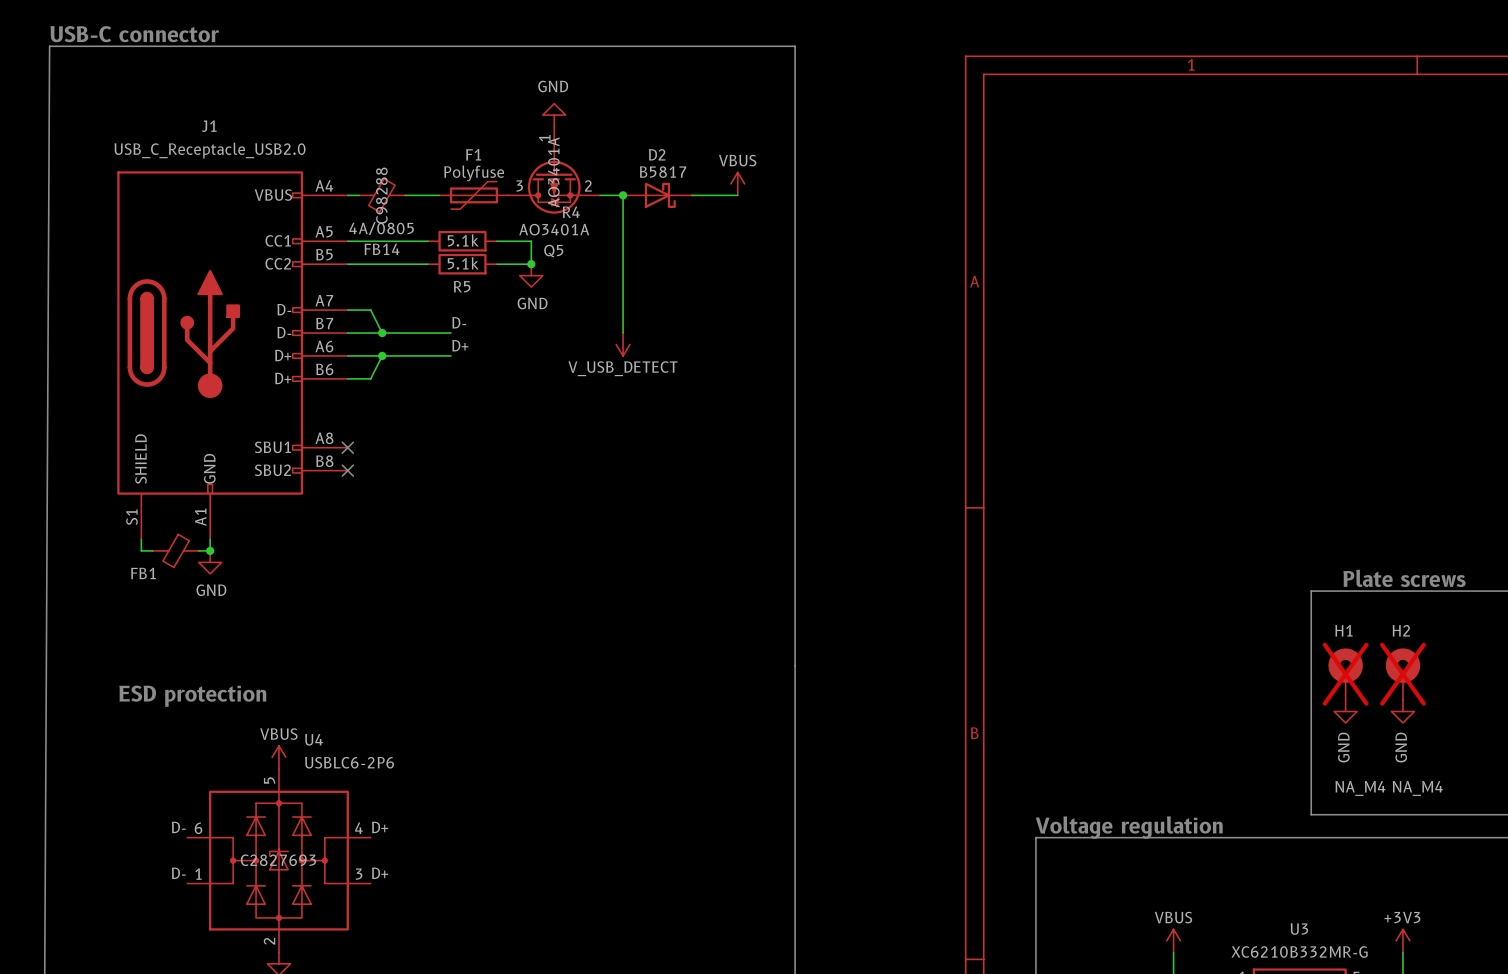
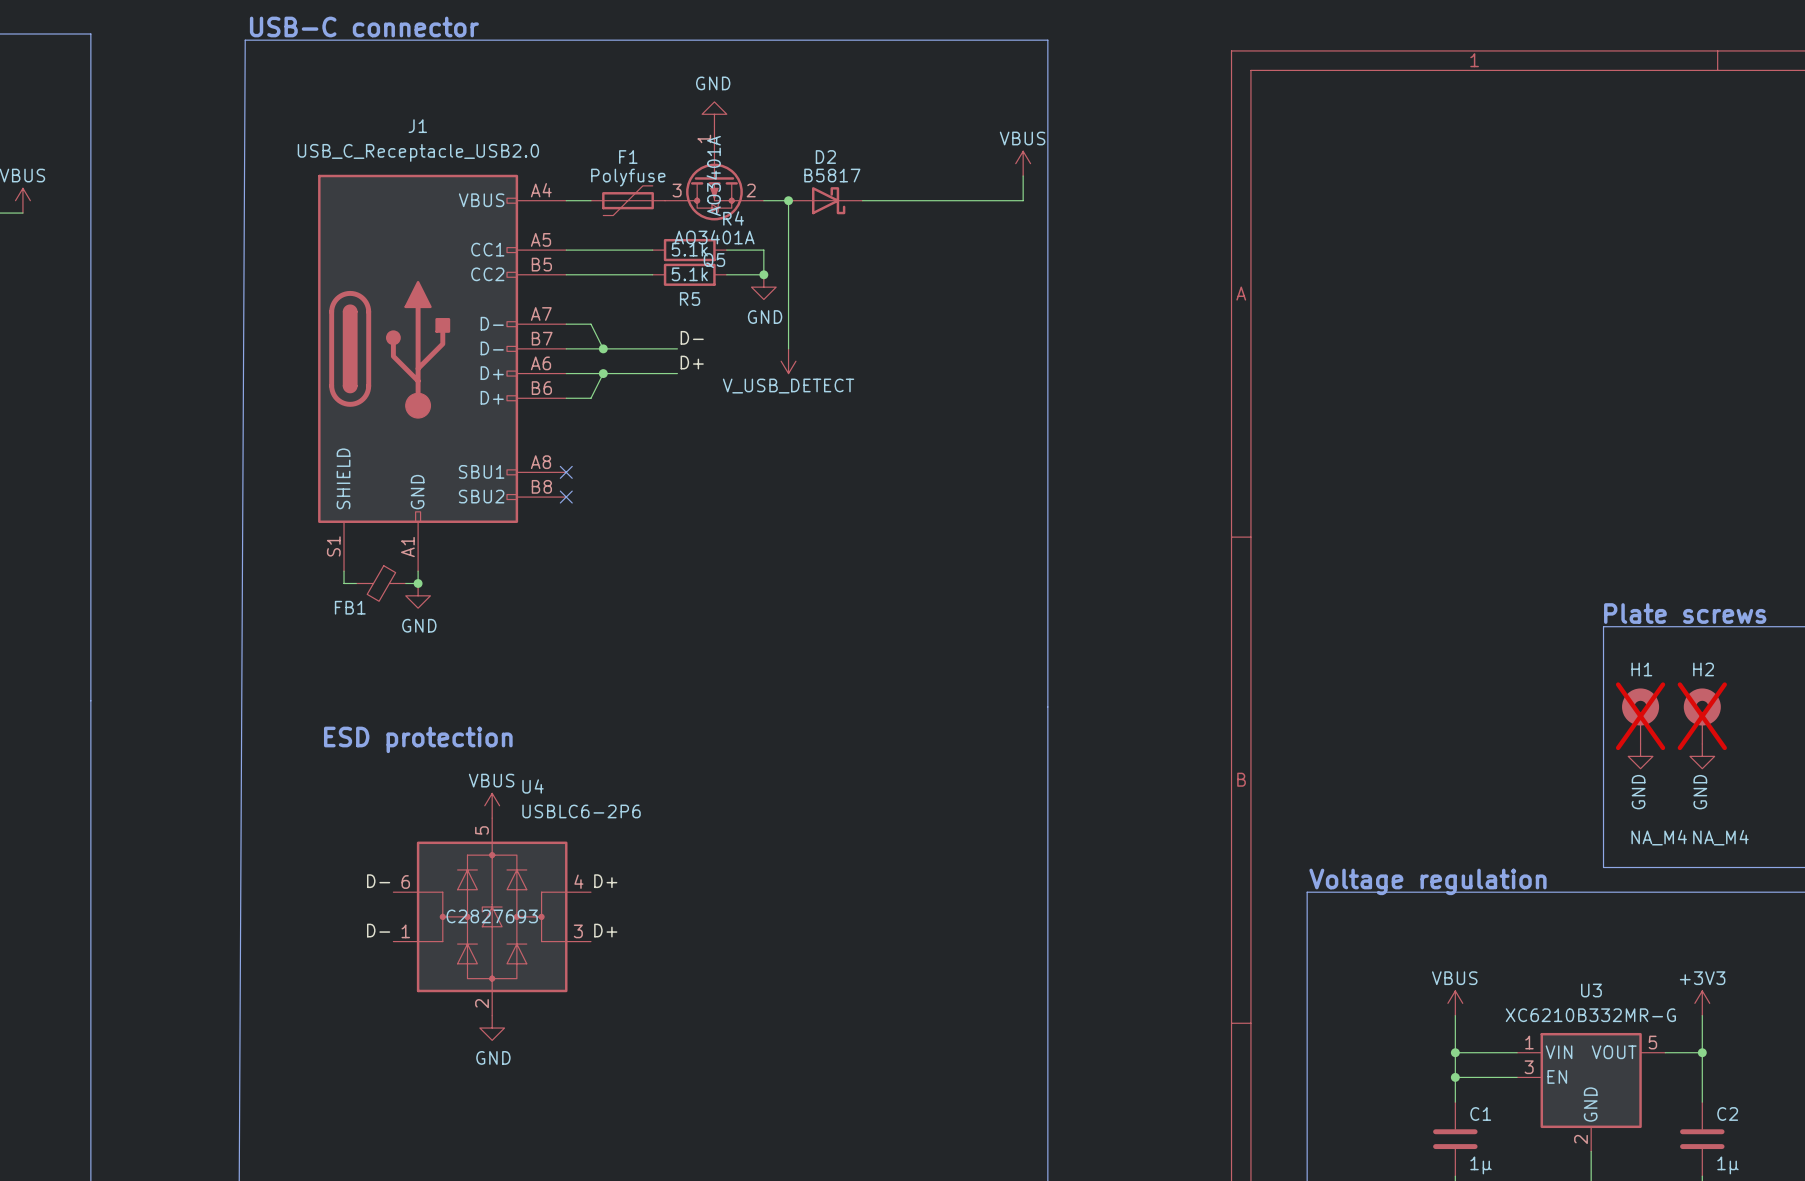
power symbol position: GND (554, 115) -> GND (714, 114)
Q5 position: (554, 170) -> (714, 173)
wire: none -> (1023, 176) (1023, 200) (986, 200)
power symbol position: VBUS (737, 183) -> VBUS (1023, 163)
FB14: 4A/0805 (382, 195) -> none
F1 position: (473, 195) -> (628, 200)
junction: none -> (788, 200)
wire: (600, 195) (623, 195) (623, 333) -> (763, 200) (788, 200) (788, 348)
junction: (623, 195) -> none
D2 position: (657, 195) -> (825, 200)
R4 name position: R4 (571, 212) -> R4 (733, 218)
power symbol position: V_USB_DETECT (623, 344) -> V_USB_DETECT (788, 361)

